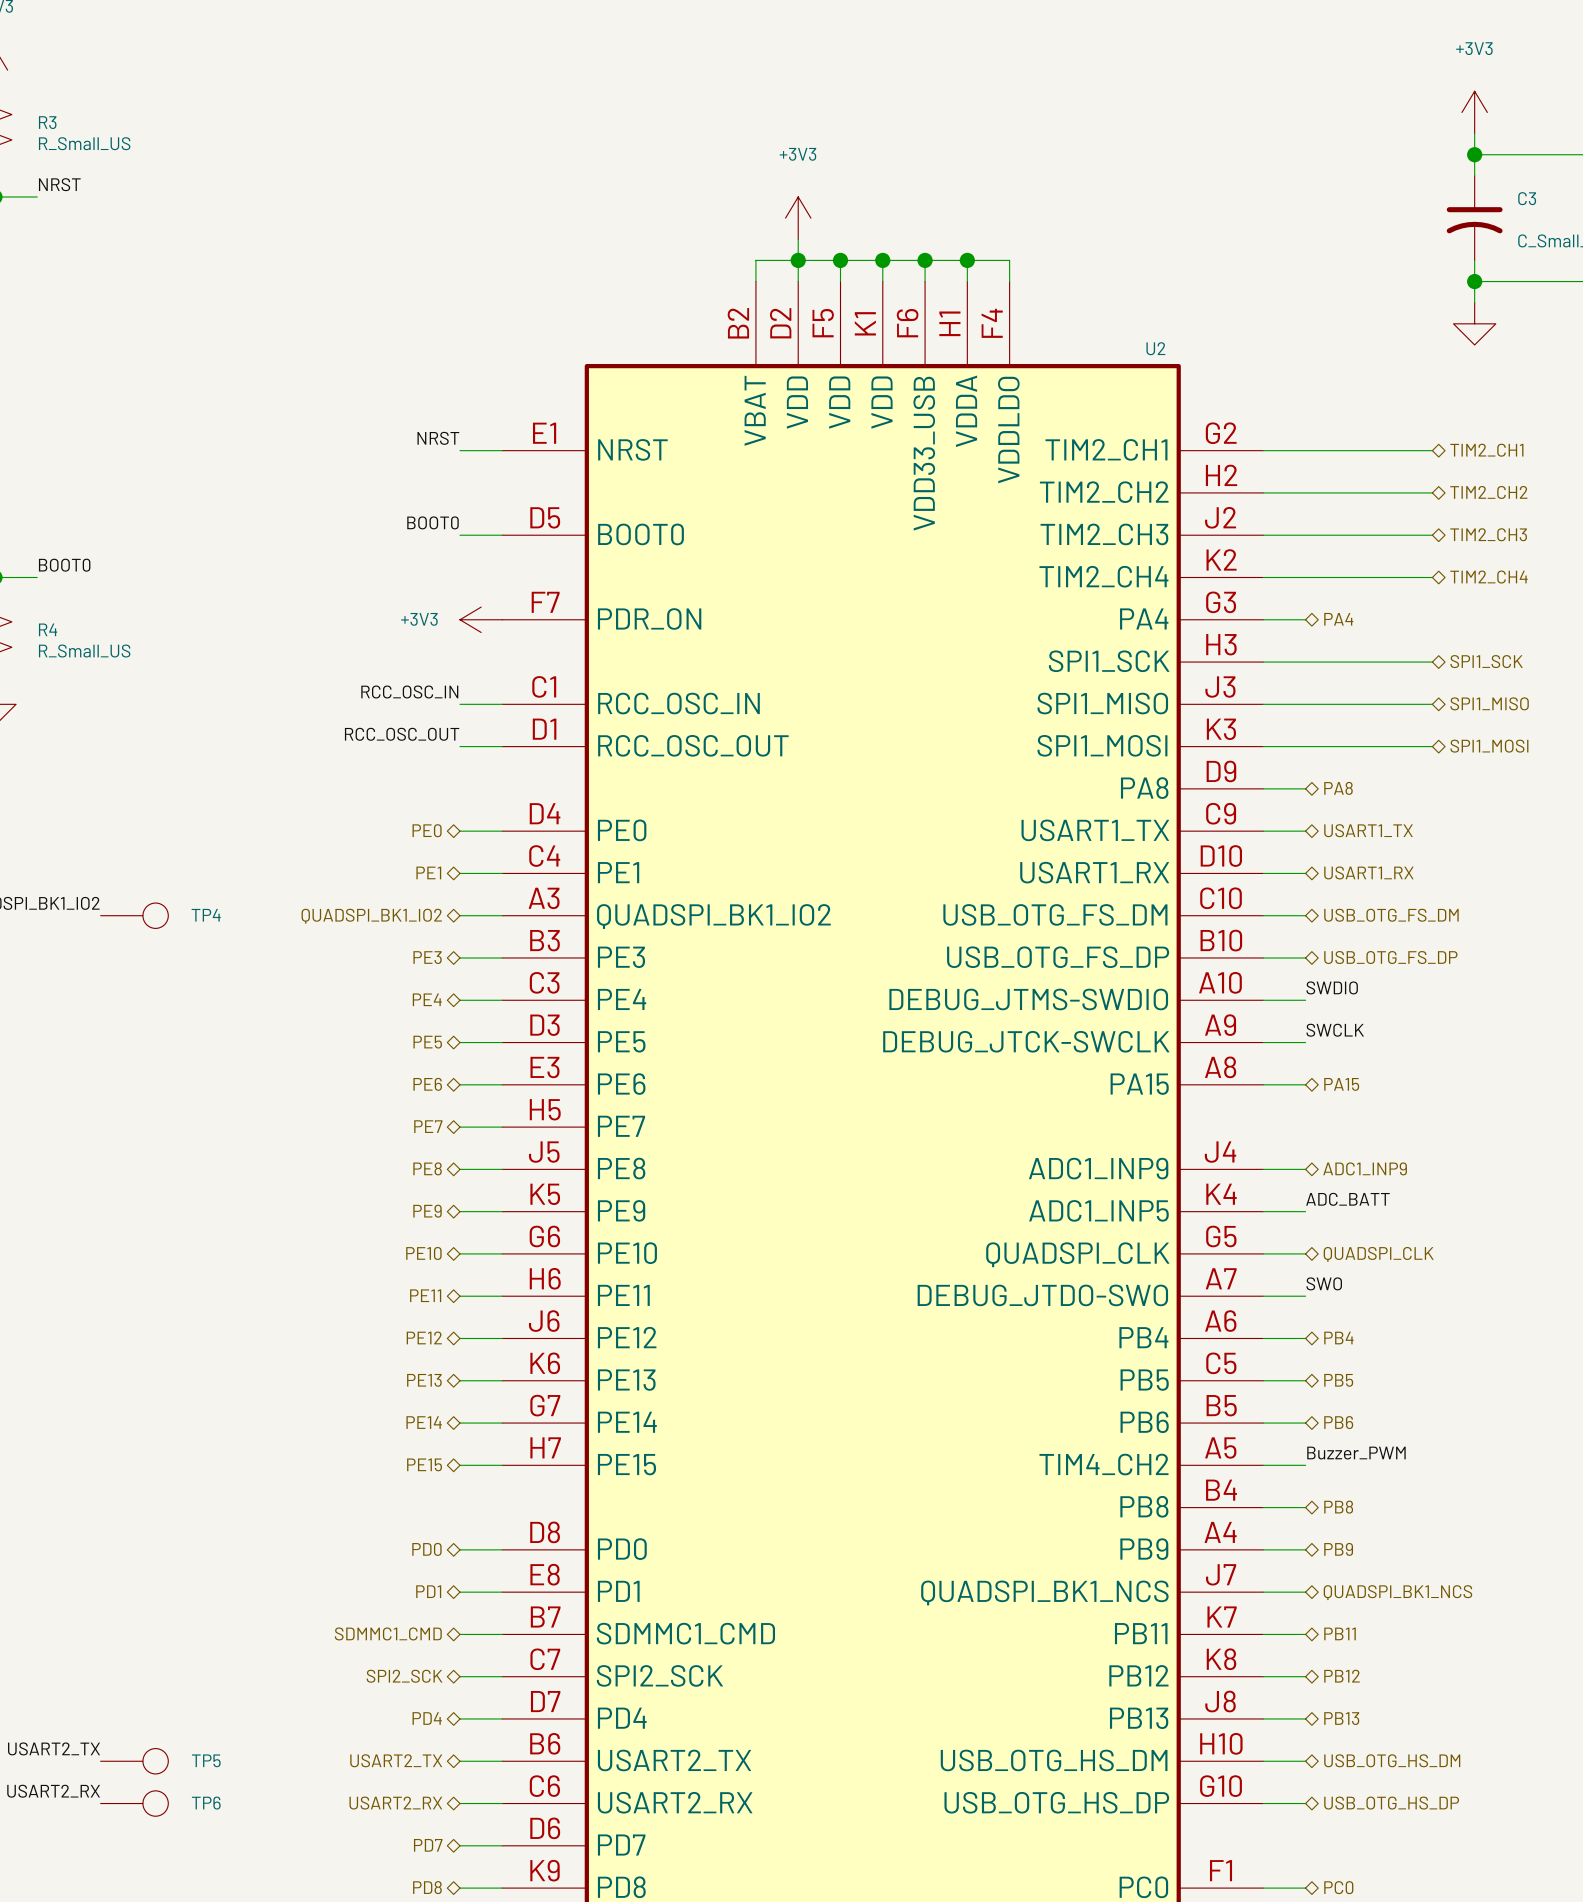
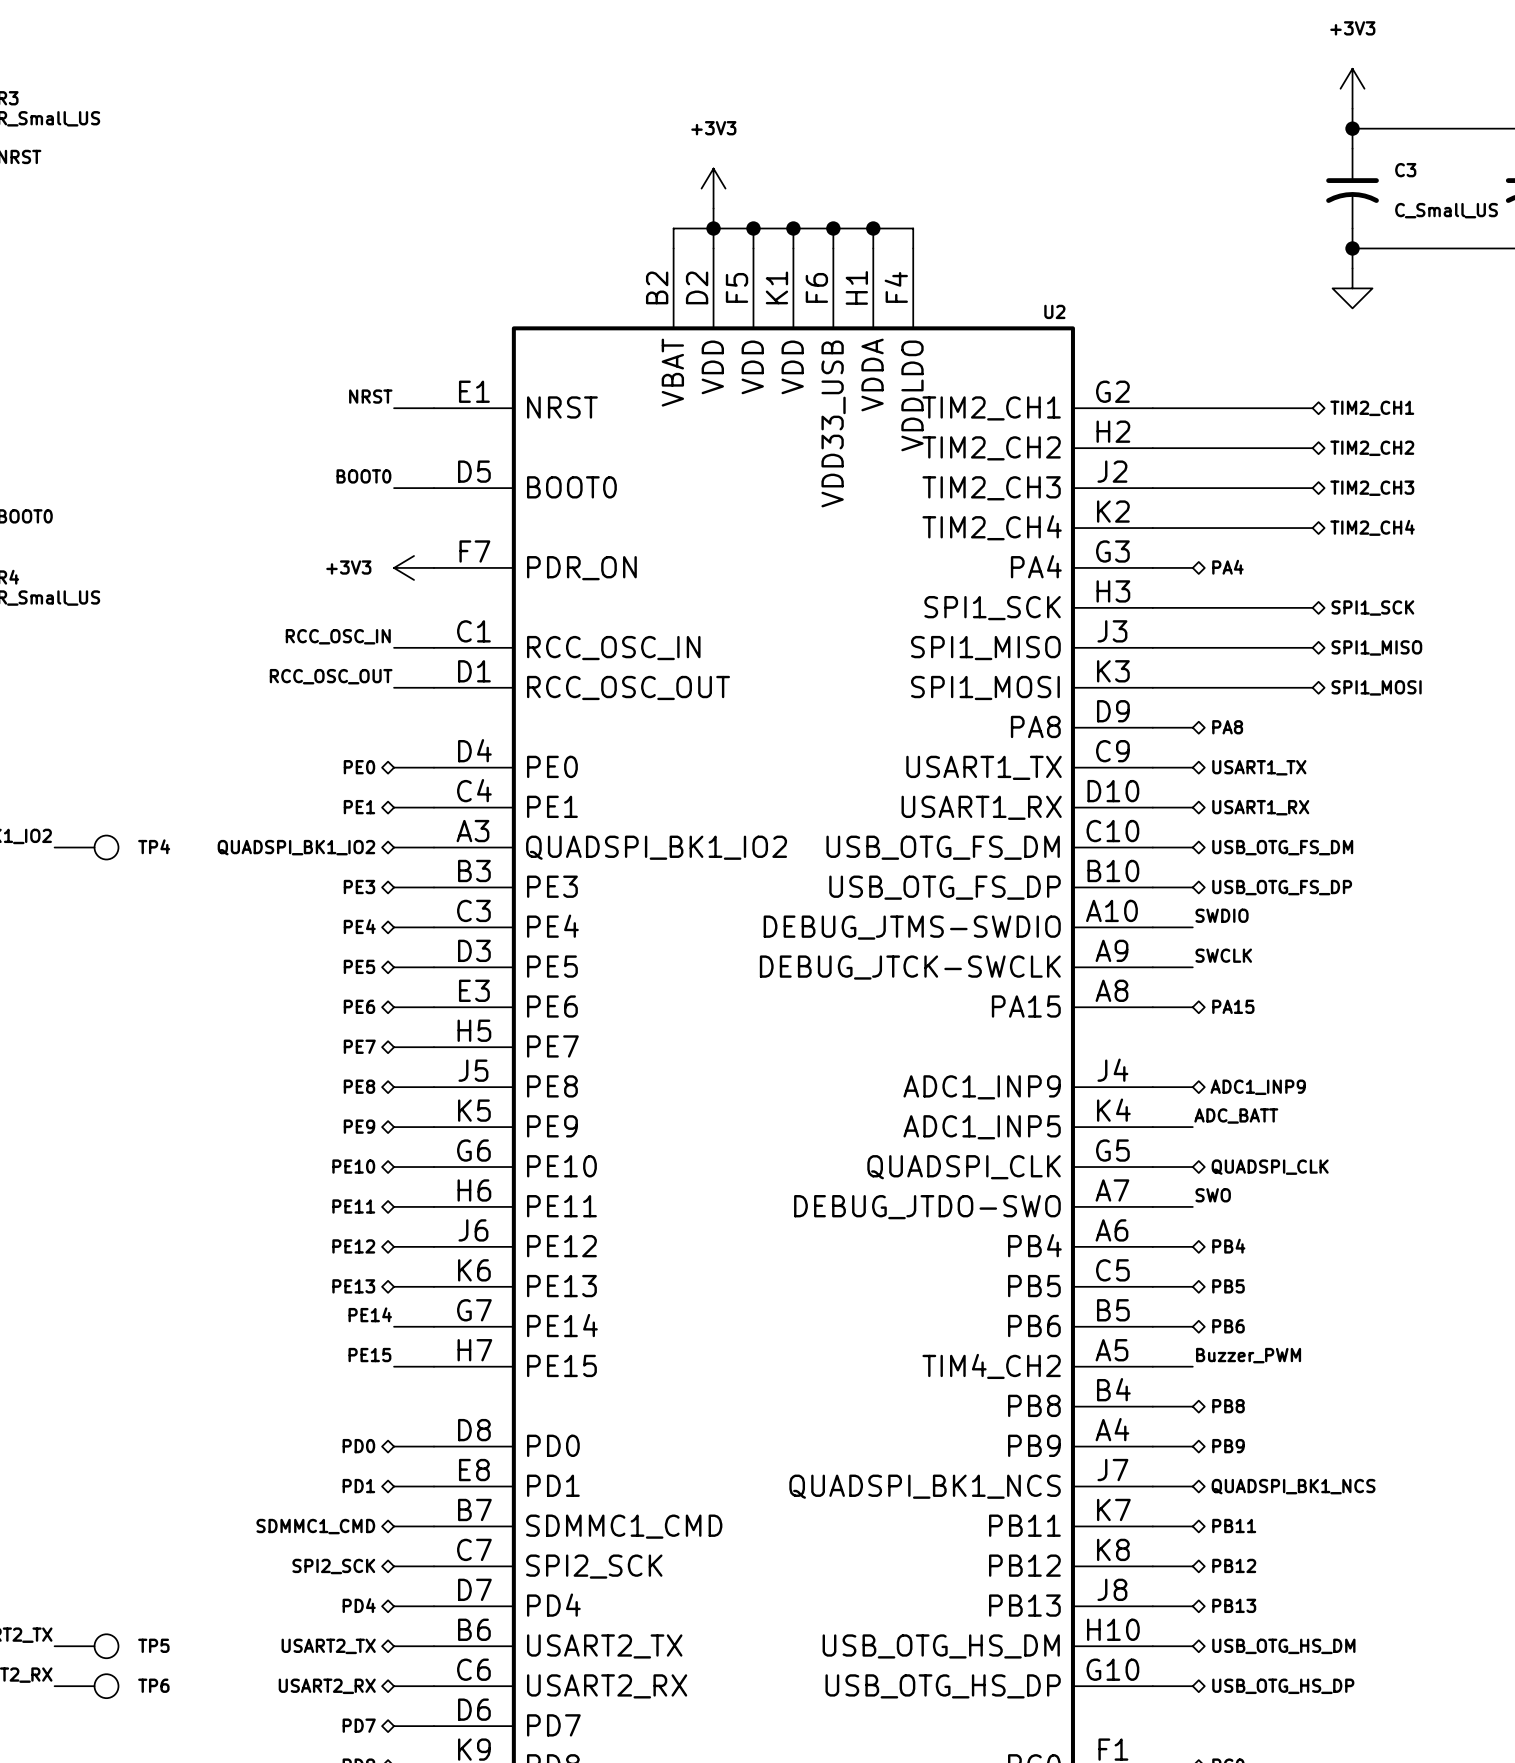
label: none -> PE14 (370, 1314)
hierarchical label: PE14 (424, 1422) -> none
label: none -> PE15 (369, 1355)
hierarchical label: PE15 (424, 1464) -> none

